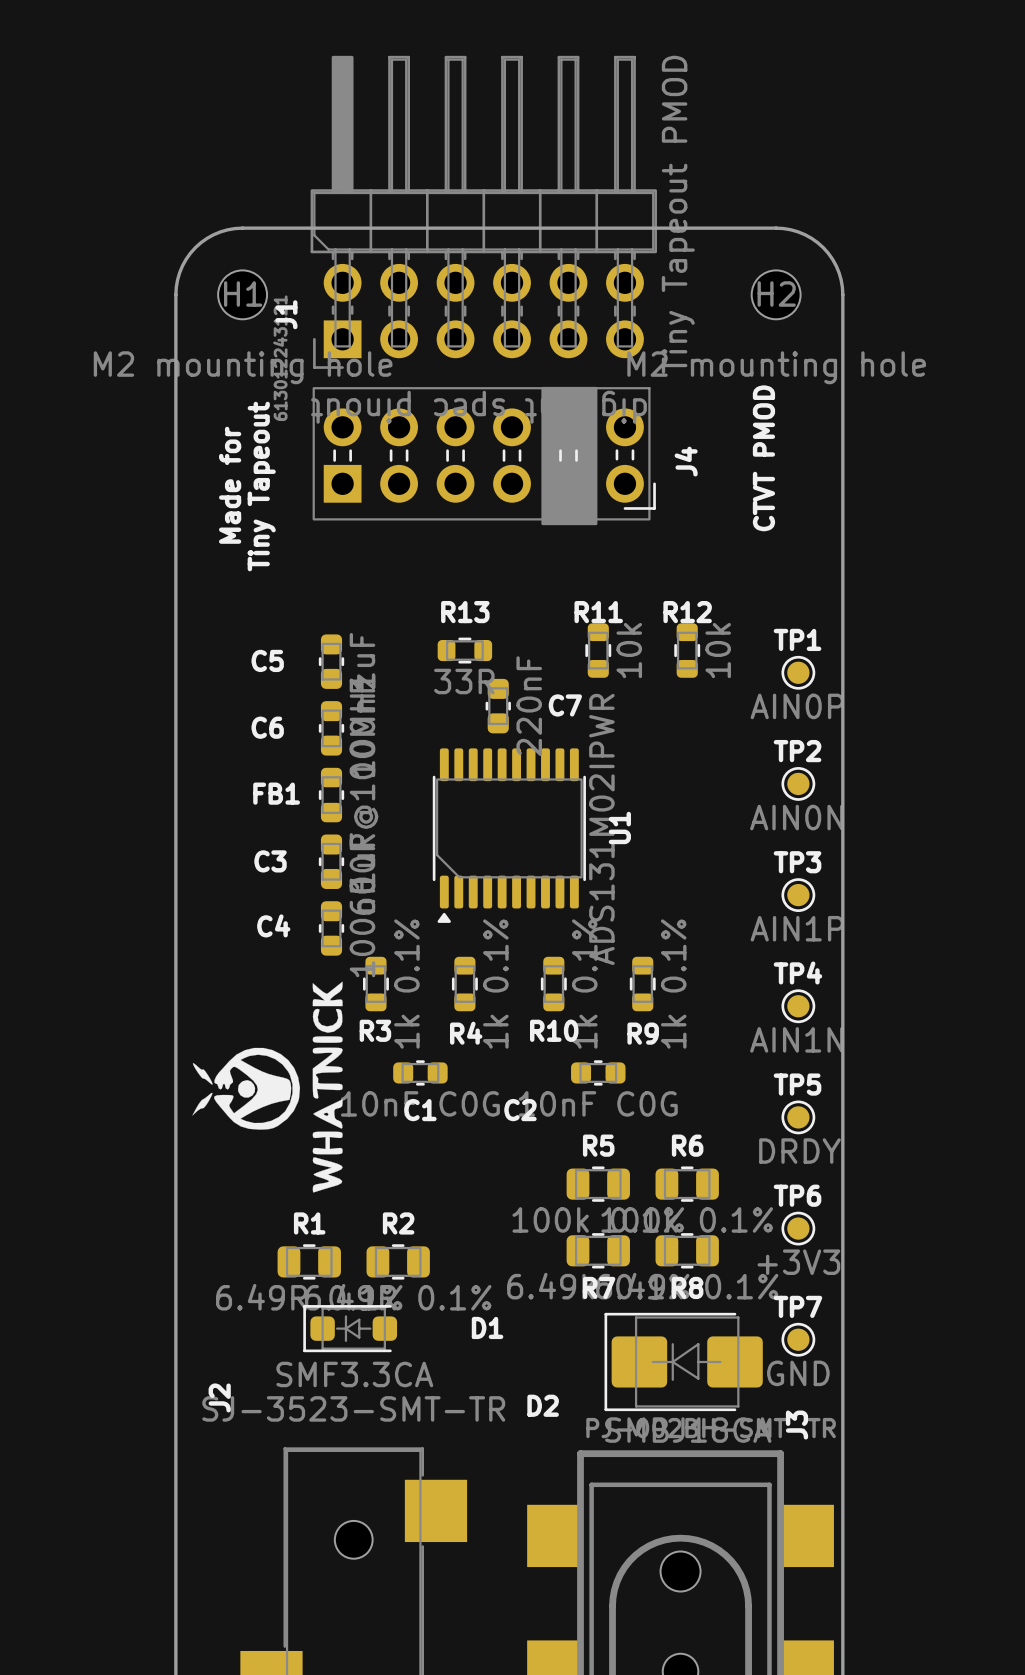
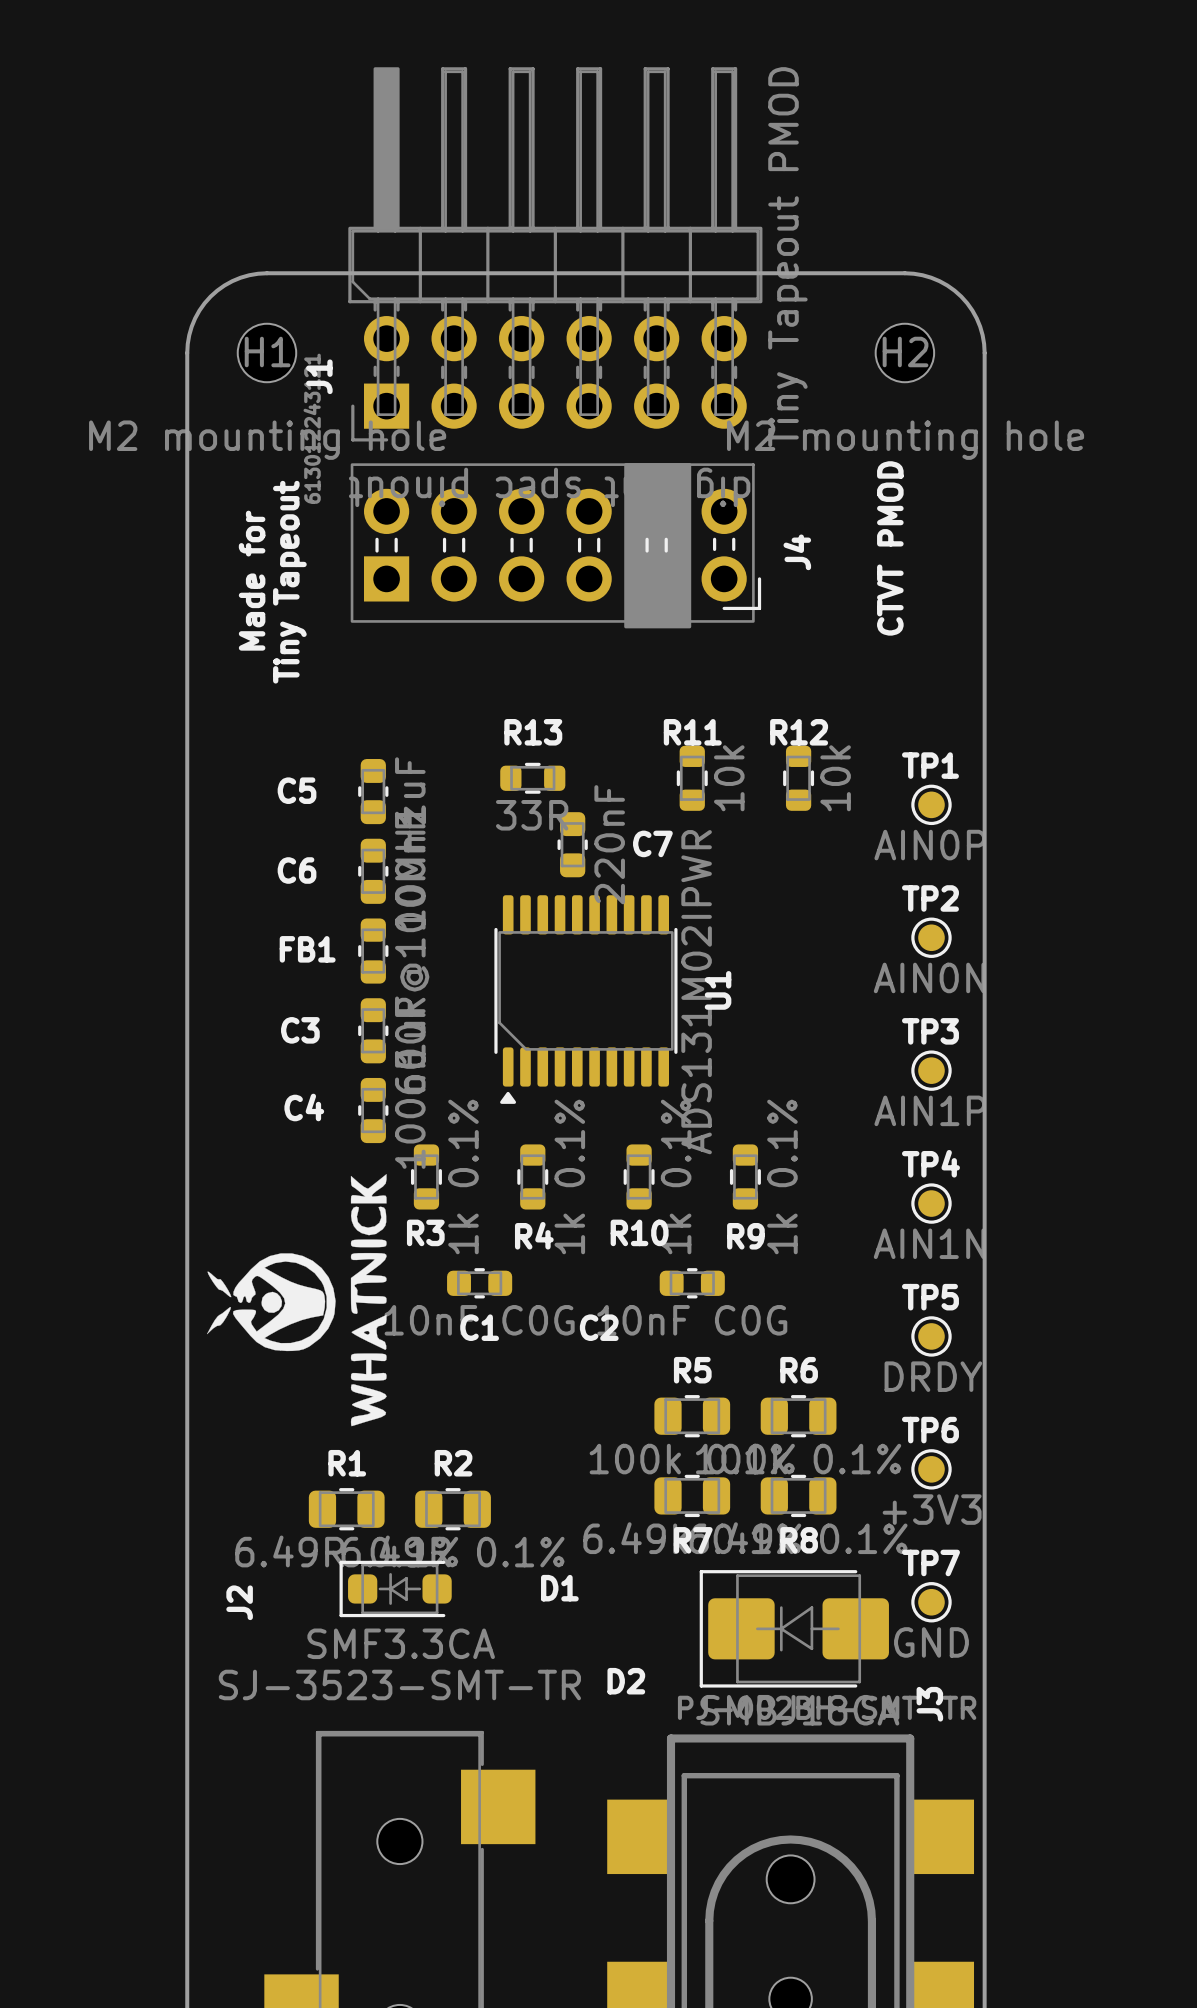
J2 name position: J2 (219, 1397) -> J2 (239, 1602)

